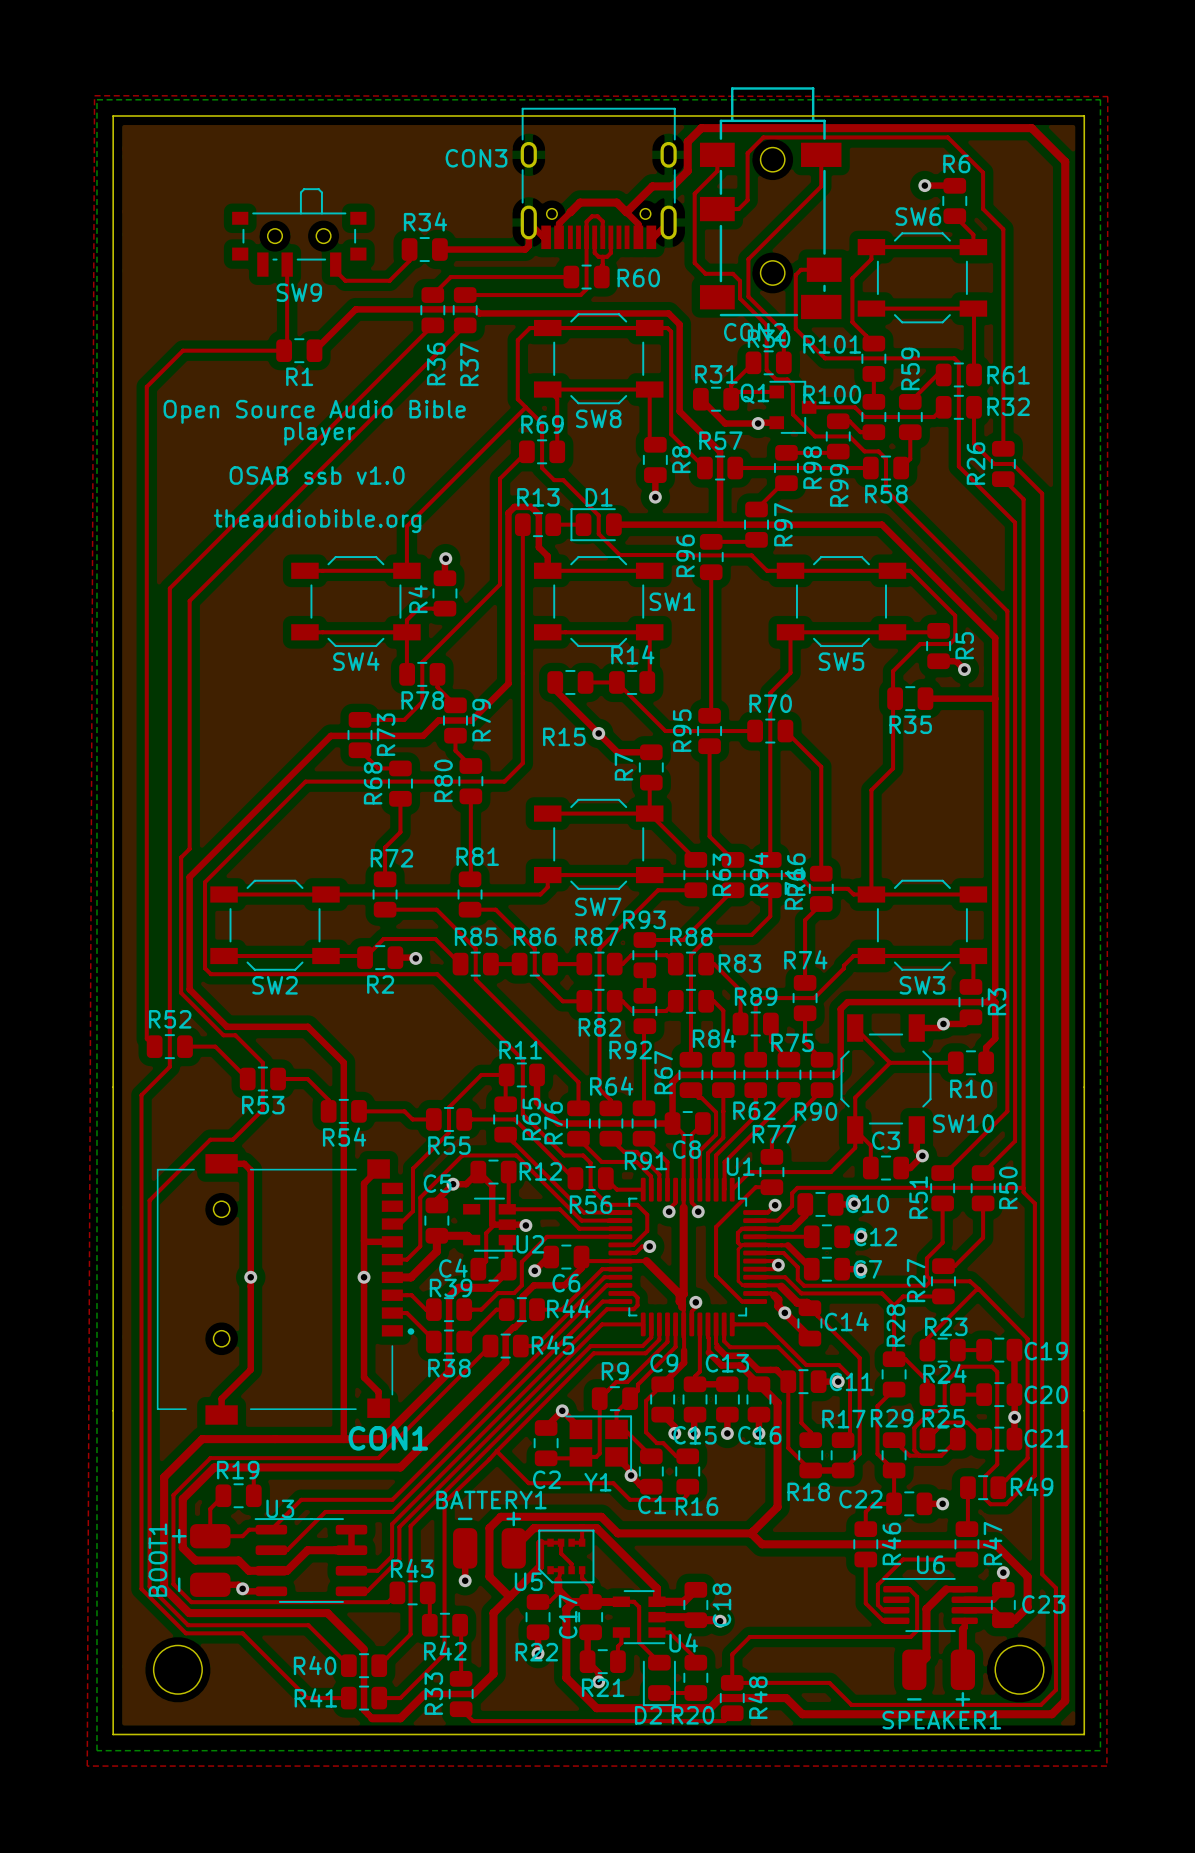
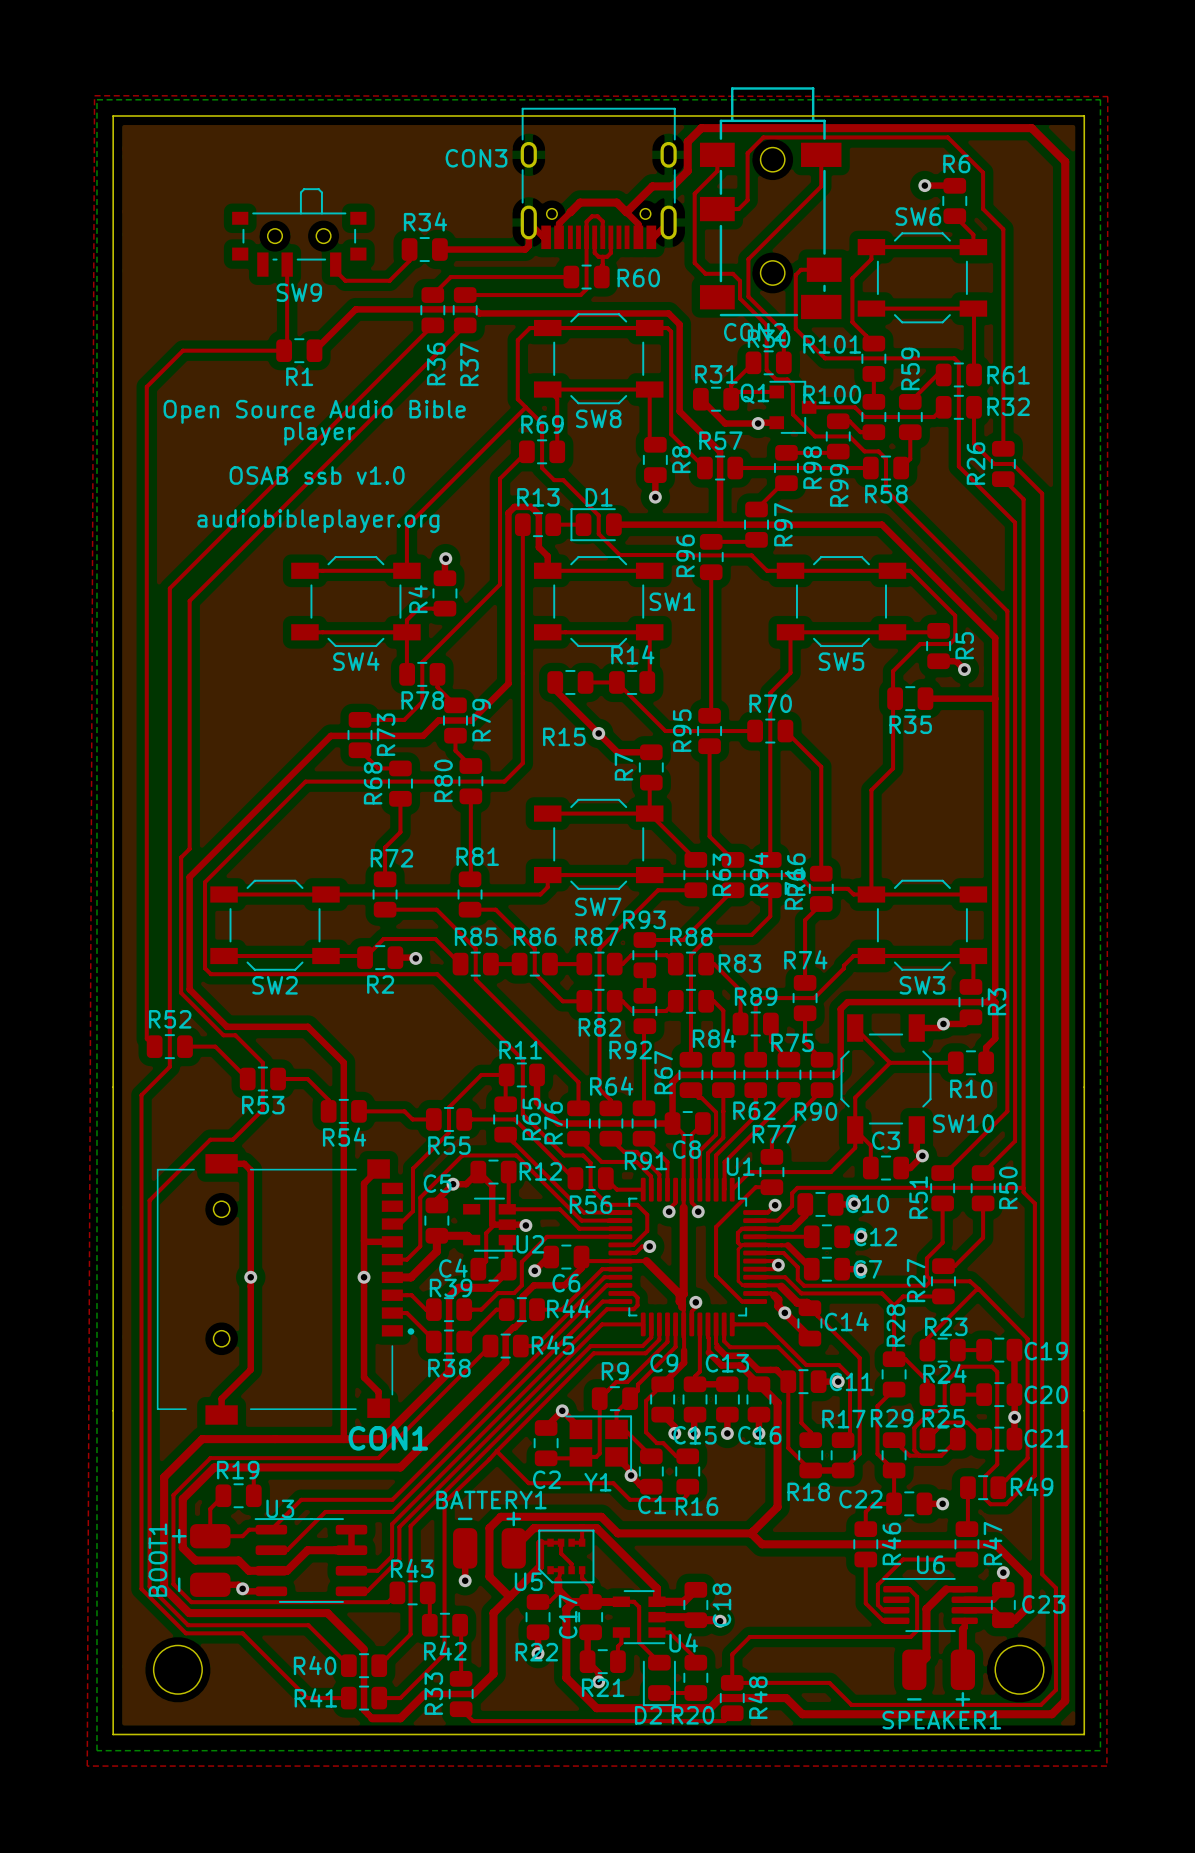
text: theaudiobible.org (317, 521) -> audiobibleplayer.org (318, 521)

